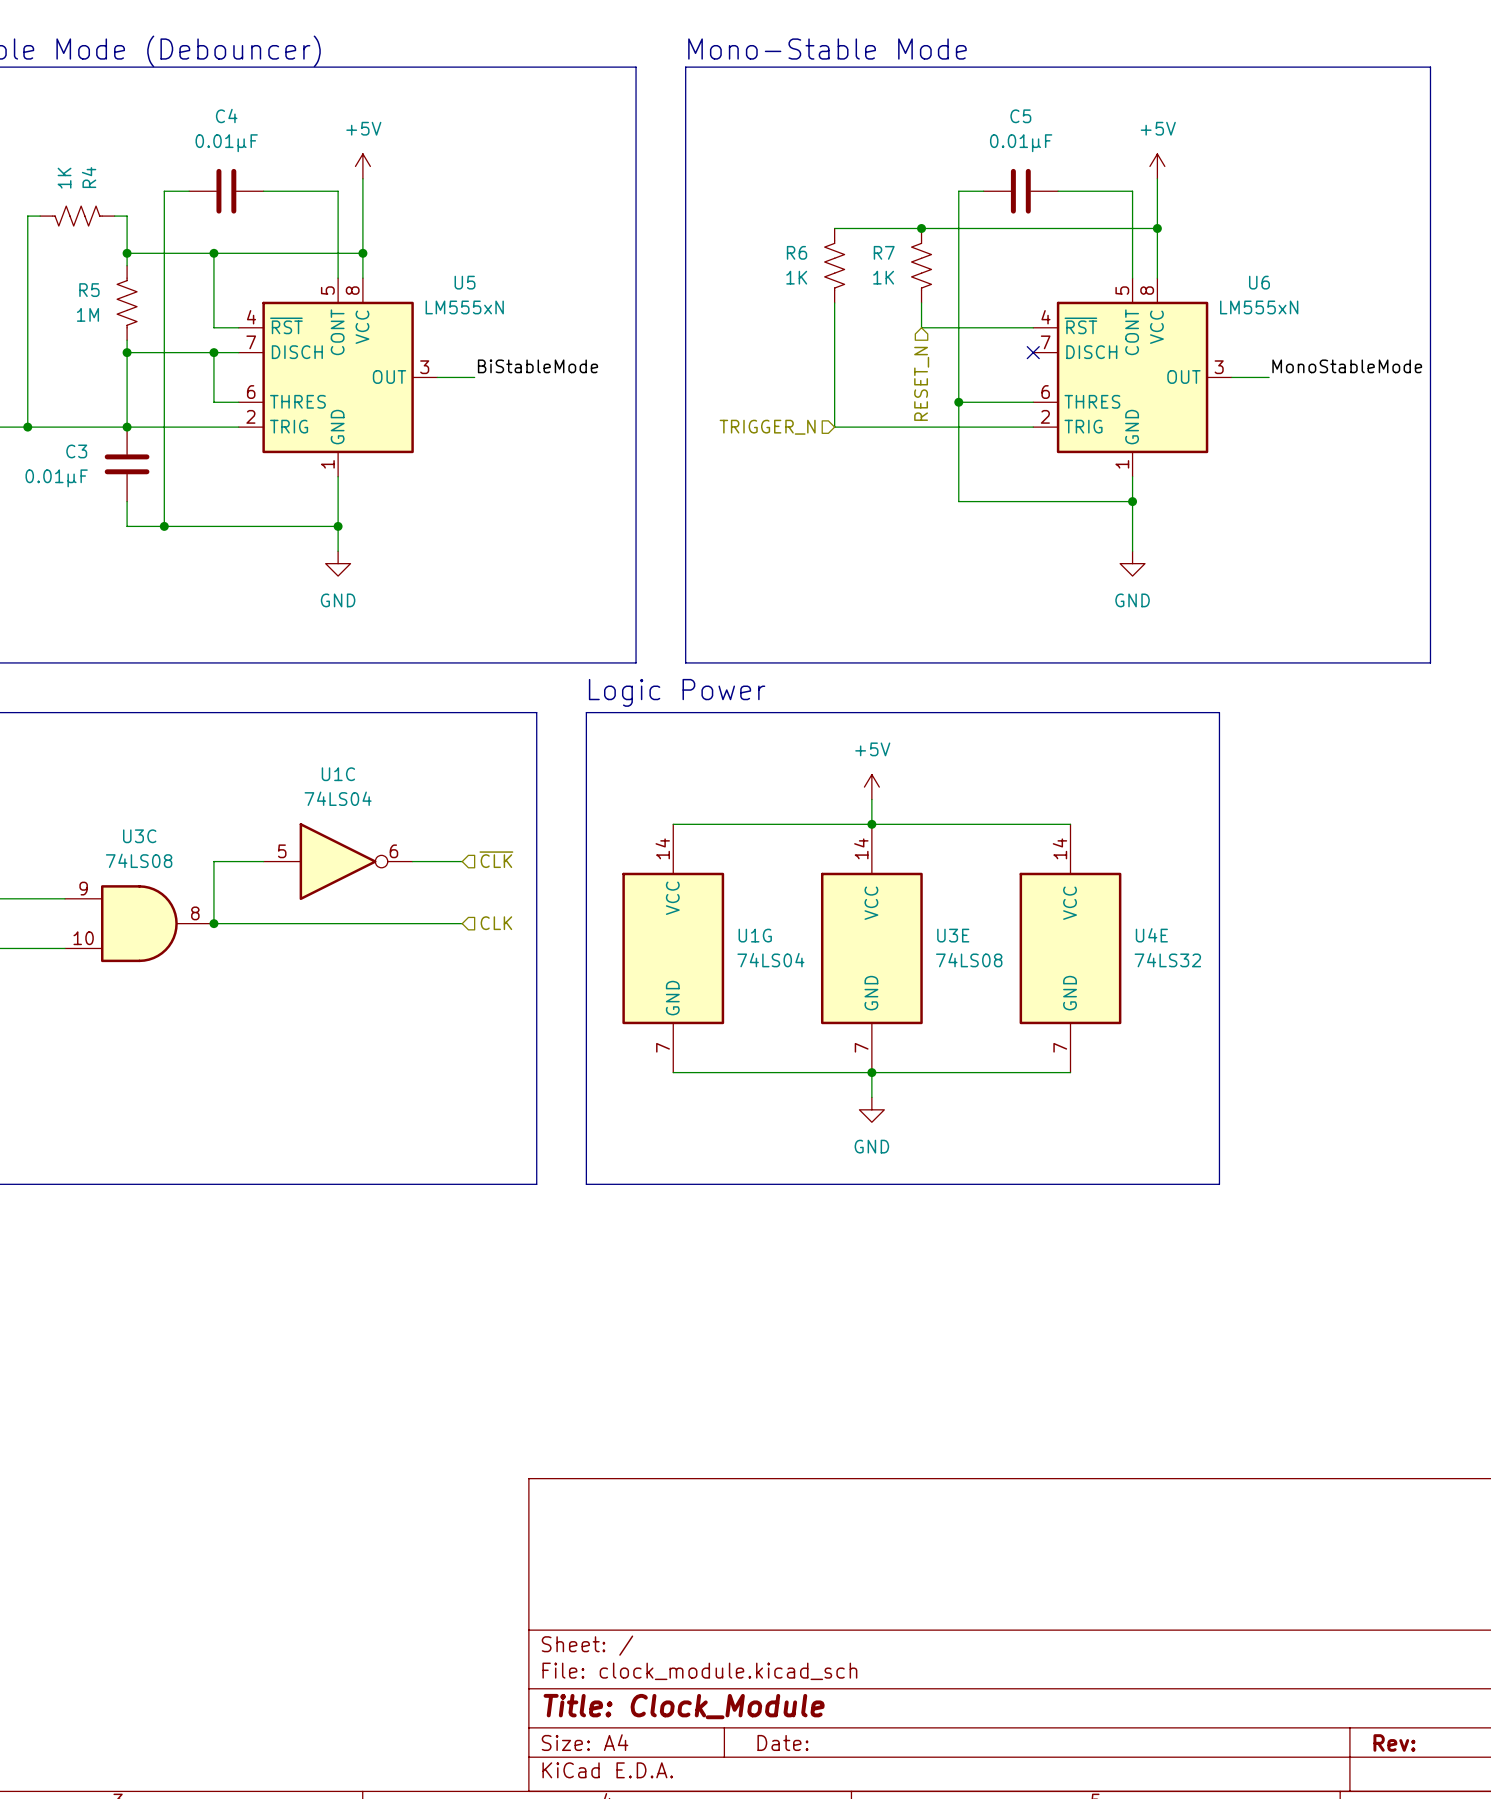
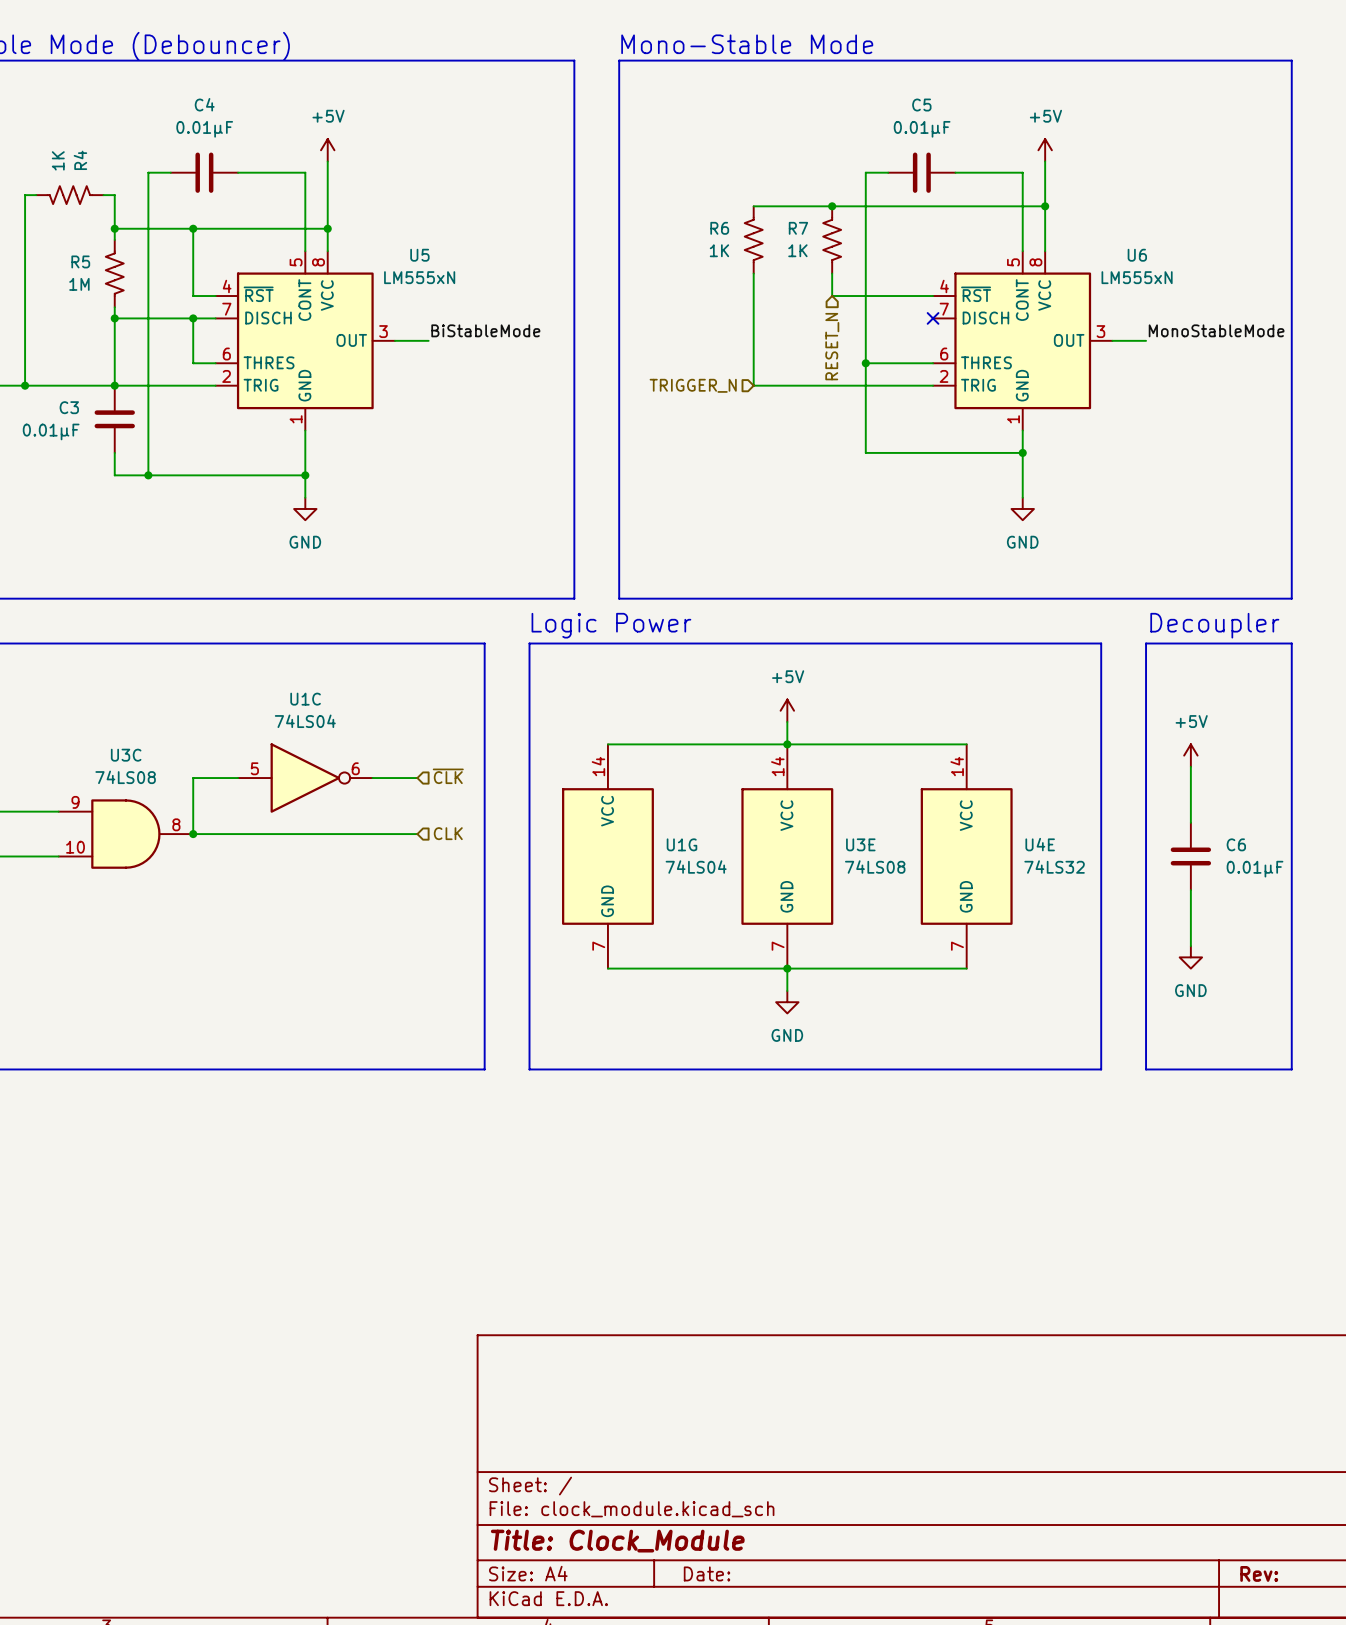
text: none -> Decoupler (1214, 625)
line: none -> (1146, 643) (1291, 643) (1291, 1069) (1146, 1069) (1146, 643)
power symbol: none -> +5V (1190, 755)
wire: none -> (1190, 766) (1190, 822)
C6: none -> 0.01µF (1190, 856)
wire: none -> (1190, 890) (1190, 946)
power symbol: none -> GND (1190, 957)

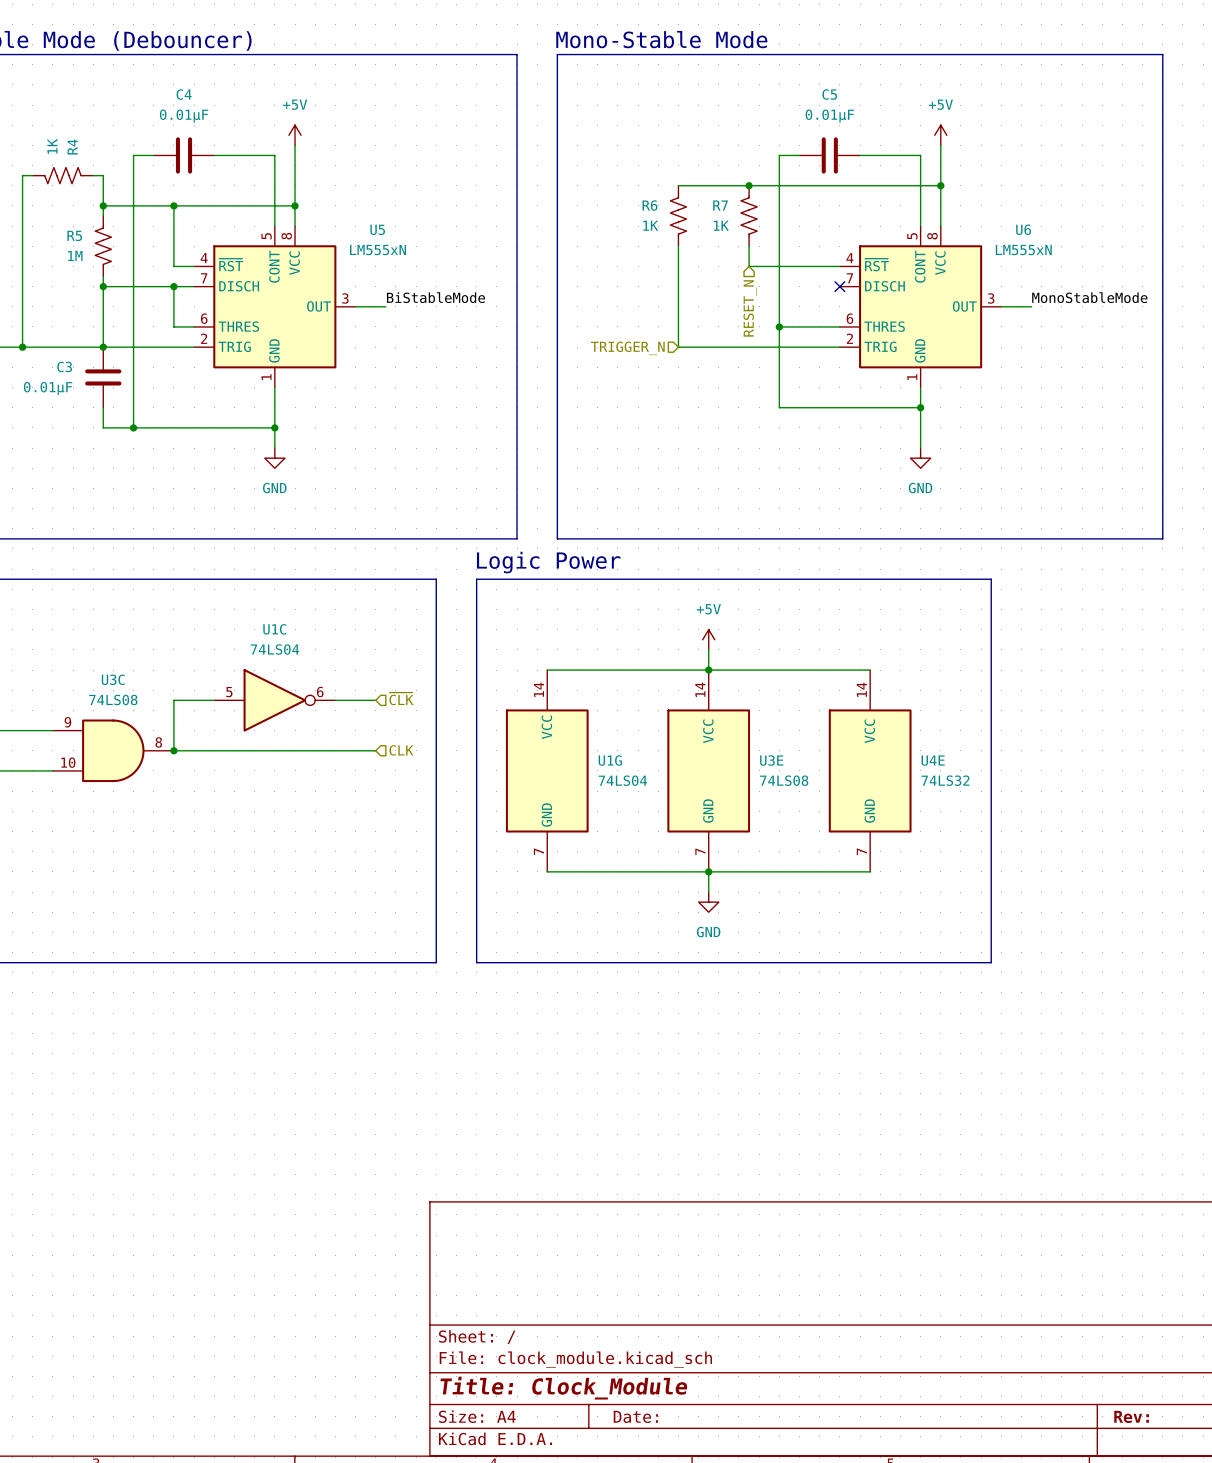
text: Decoupler (1214, 625) -> none
line: (1146, 643) (1291, 643) (1291, 1069) (1146, 1069) (1146, 643) -> none
power symbol: +5V (1190, 755) -> none
wire: (1190, 766) (1190, 822) -> none
C6: 0.01µF (1190, 856) -> none
wire: (1190, 890) (1190, 946) -> none
power symbol: GND (1190, 957) -> none

